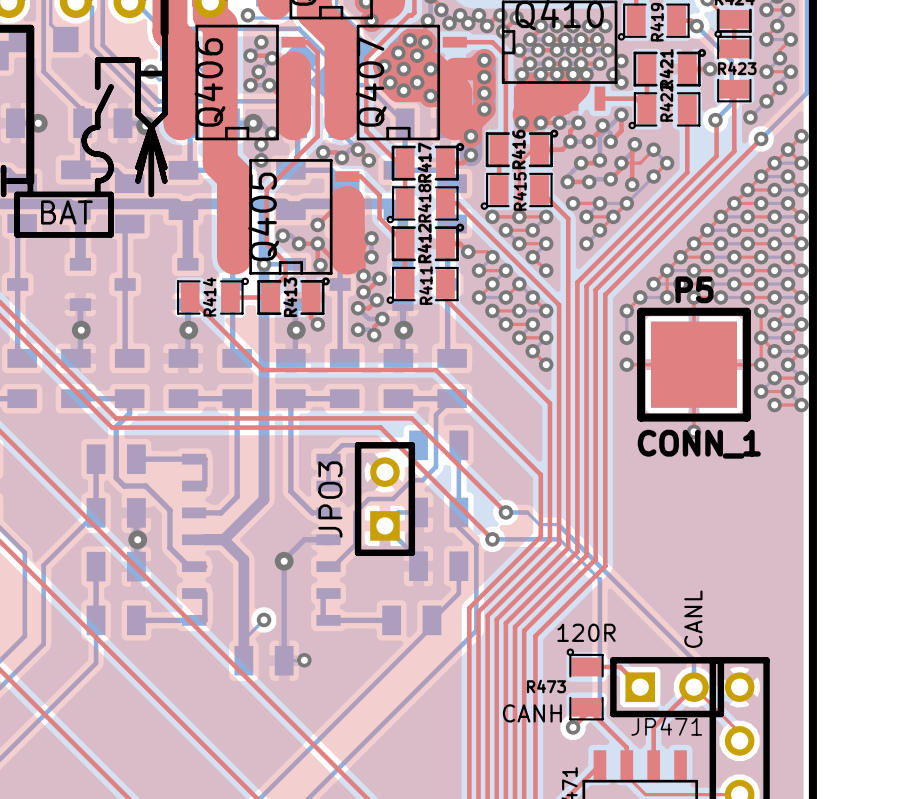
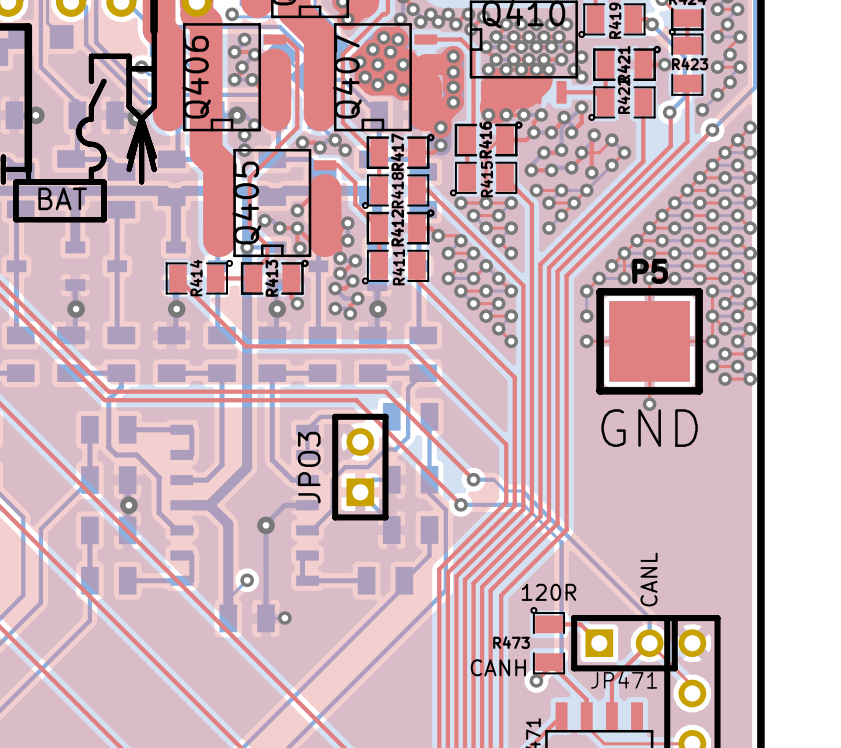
P5 value: CONN_1 (699, 444) -> none
text: none -> GND (649, 428)

